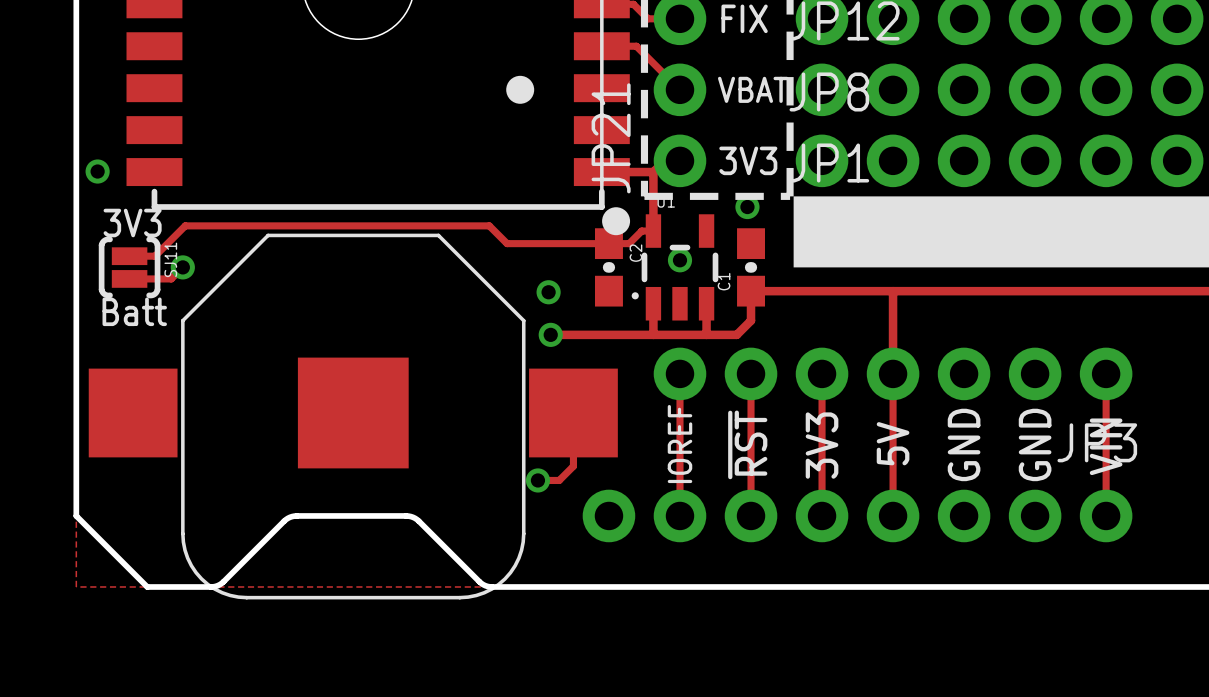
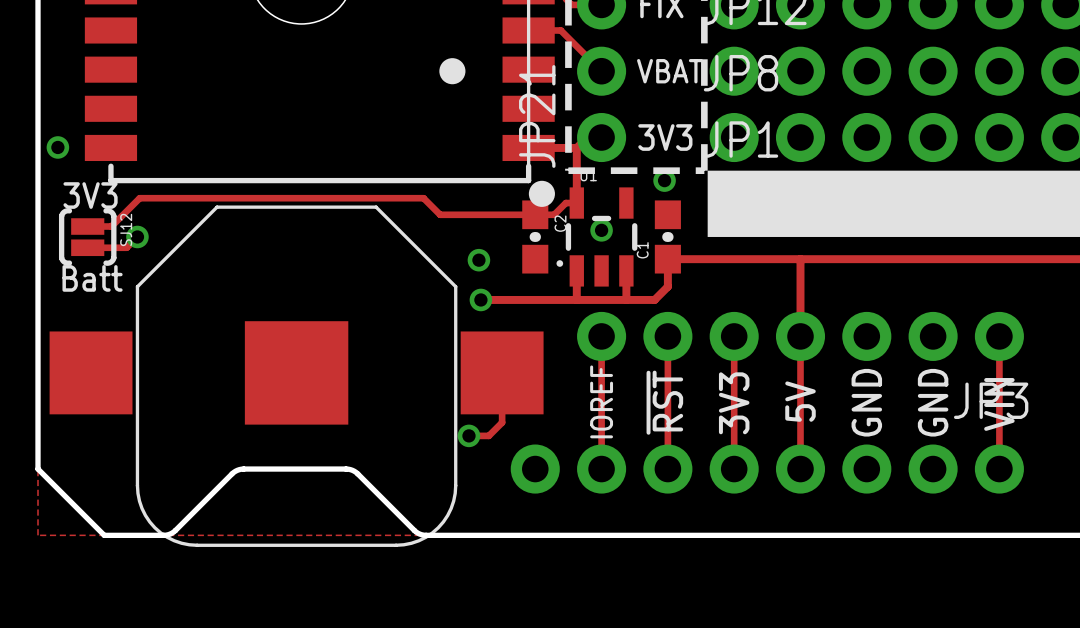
SJ11 name: SJ11 (170, 259) -> SJ12 (126, 229)

